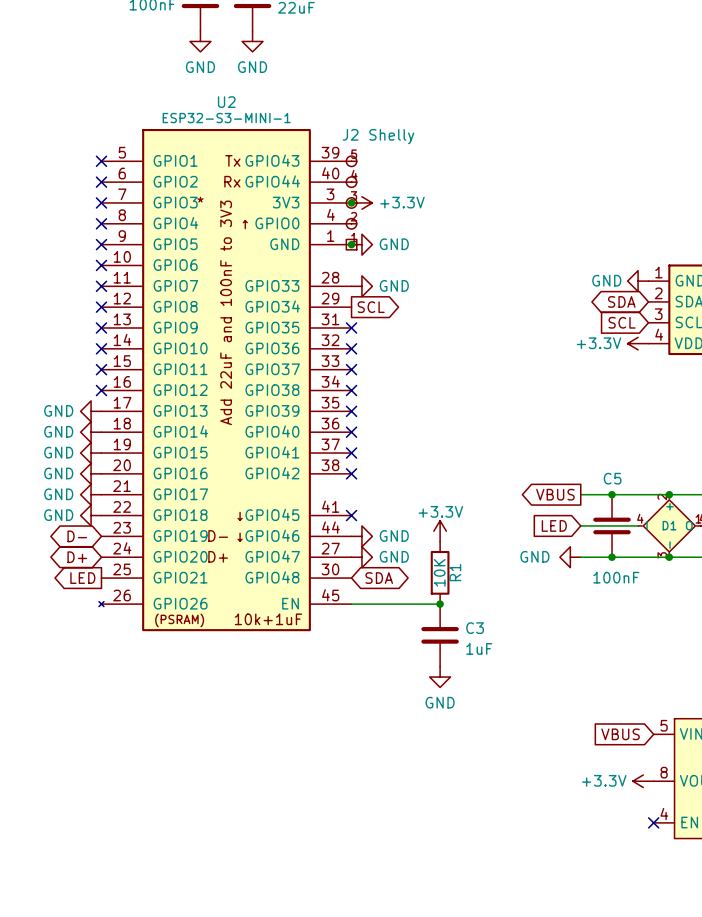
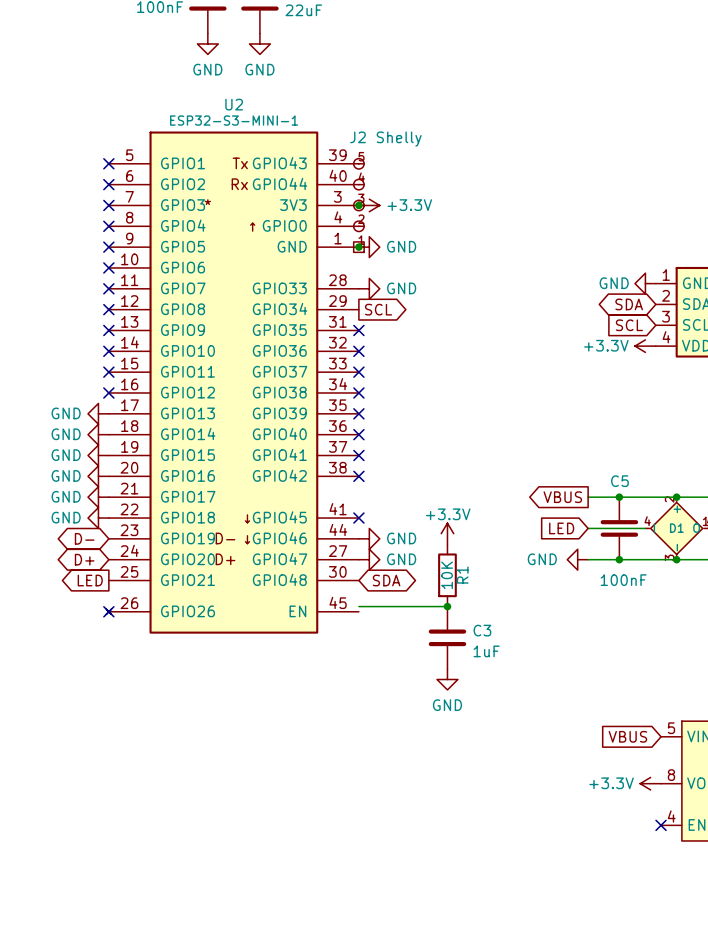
U2 symbol: [99, 128, 352, 632] -> [106, 131, 359, 634]
no-connect mark: none -> (108, 611)

